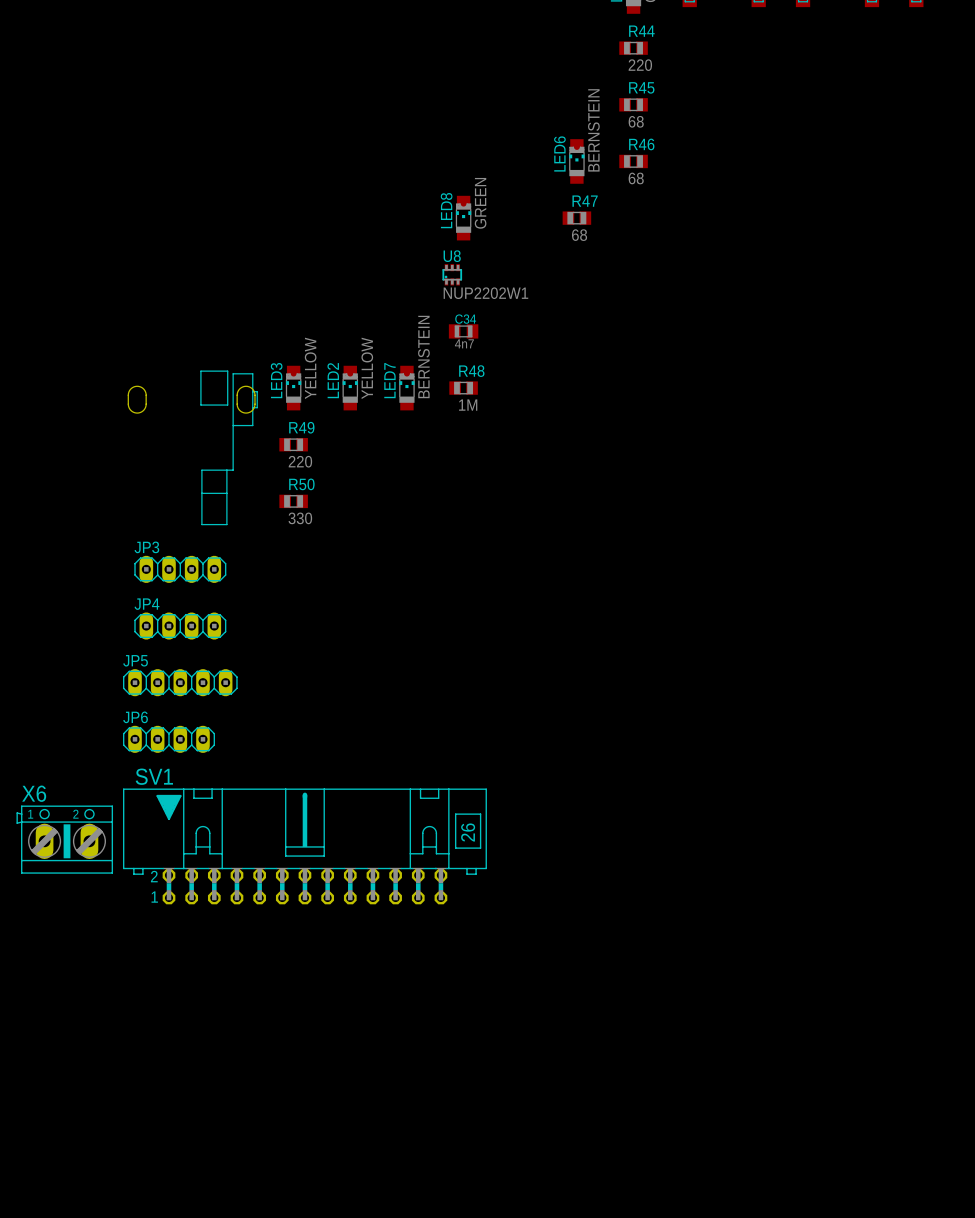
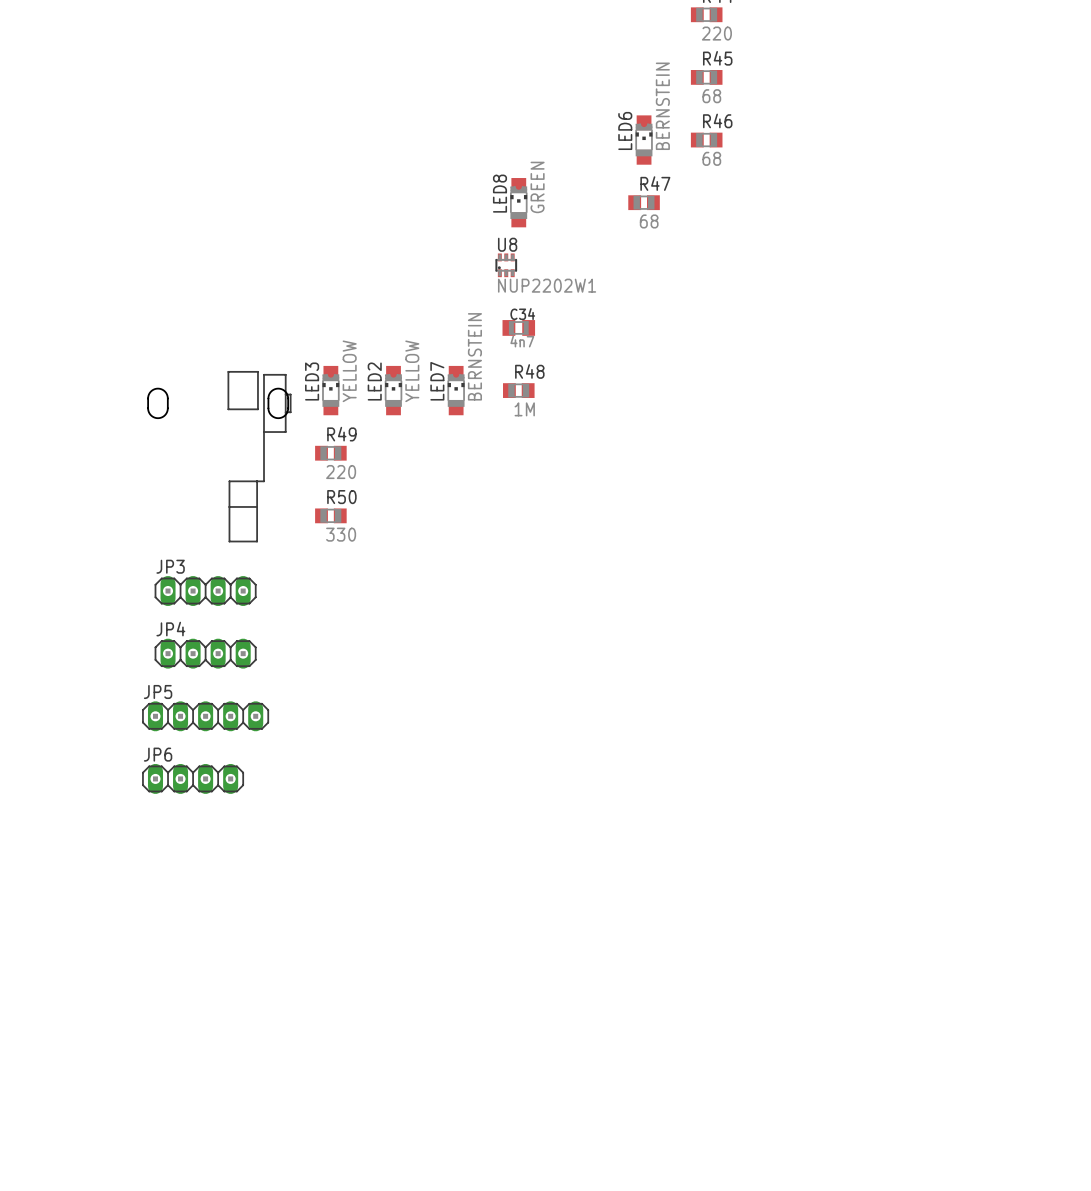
X6: (64, 839) -> none
SV1: (304, 846) -> none

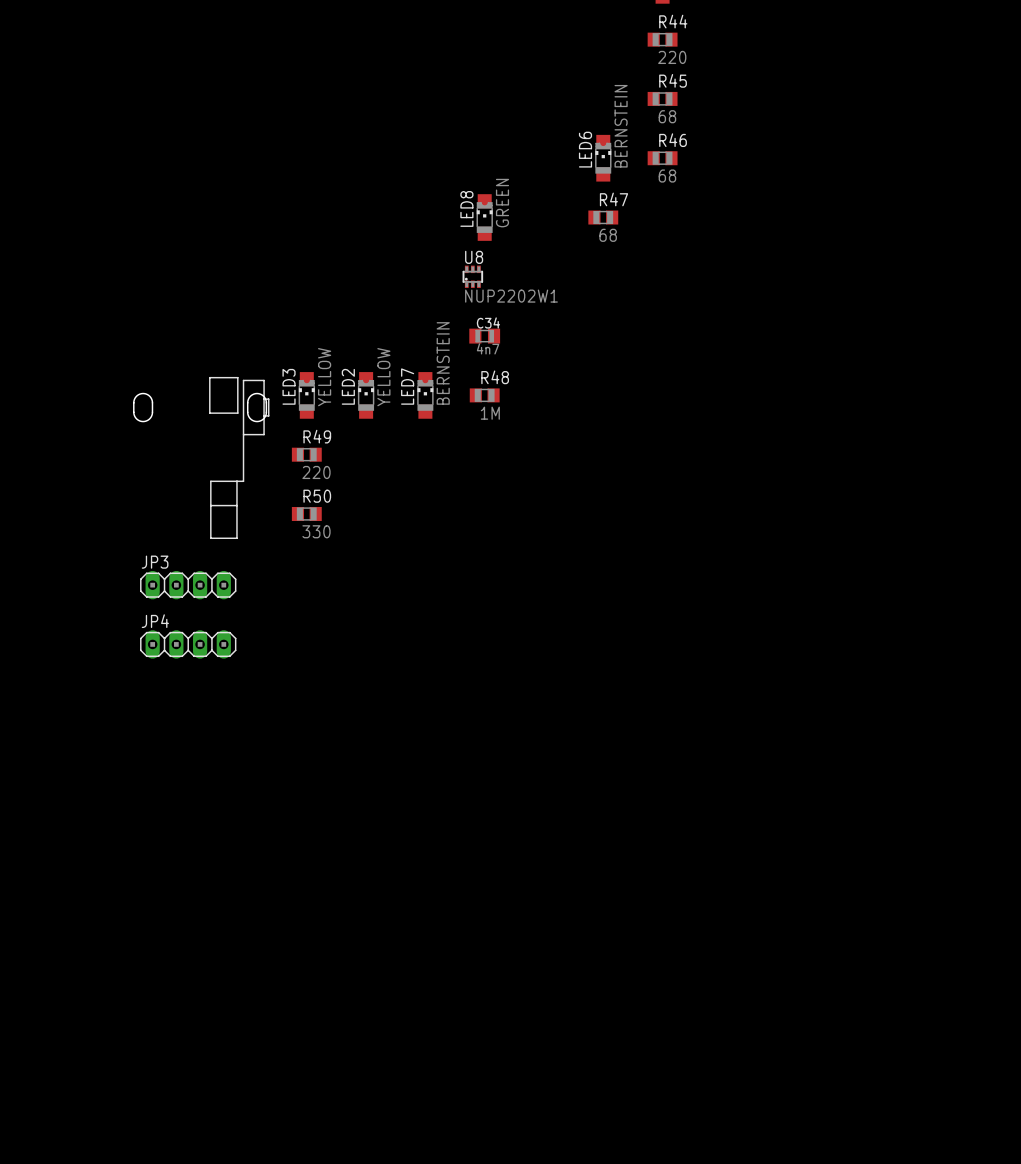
JP5: (205, 716) -> none
JP6: (193, 778) -> none

